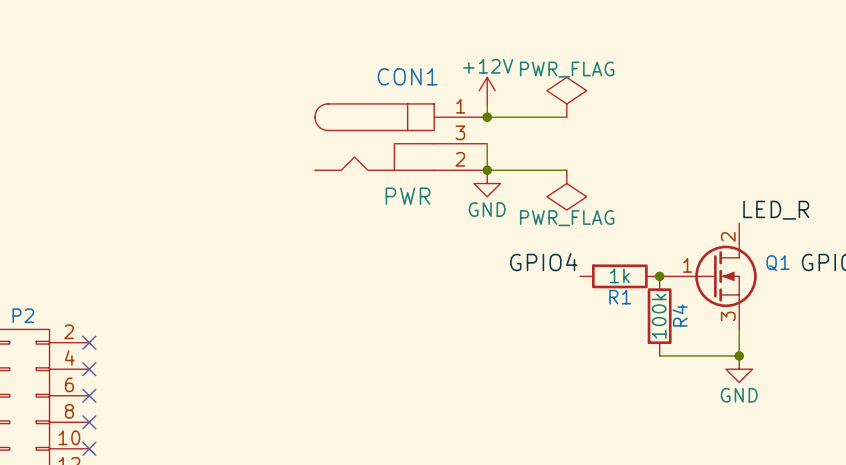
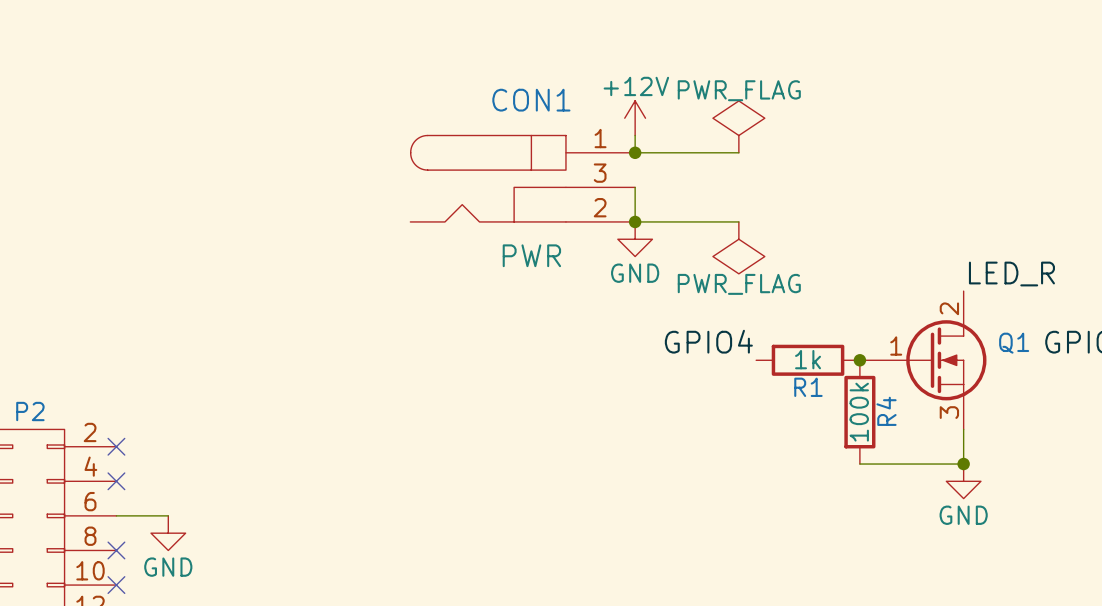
wire: none -> (116, 515) (168, 515)
no-connect mark: (89, 395) -> none
power symbol: none -> GND (168, 533)

